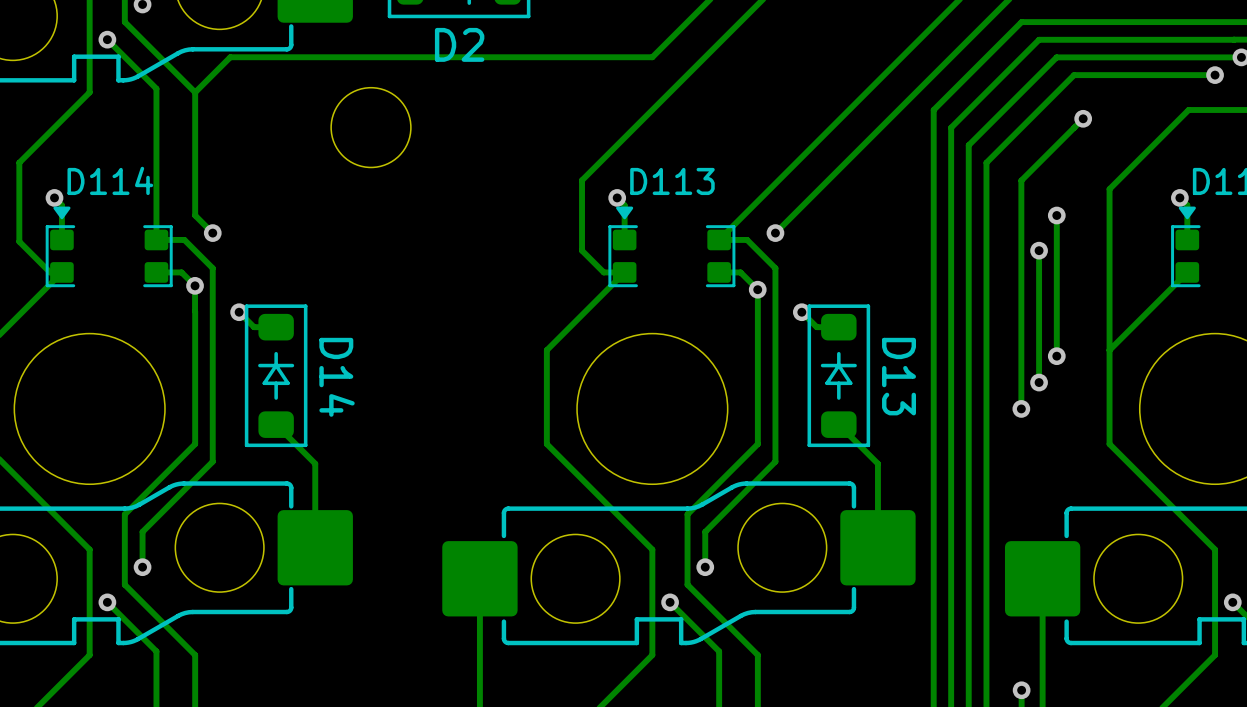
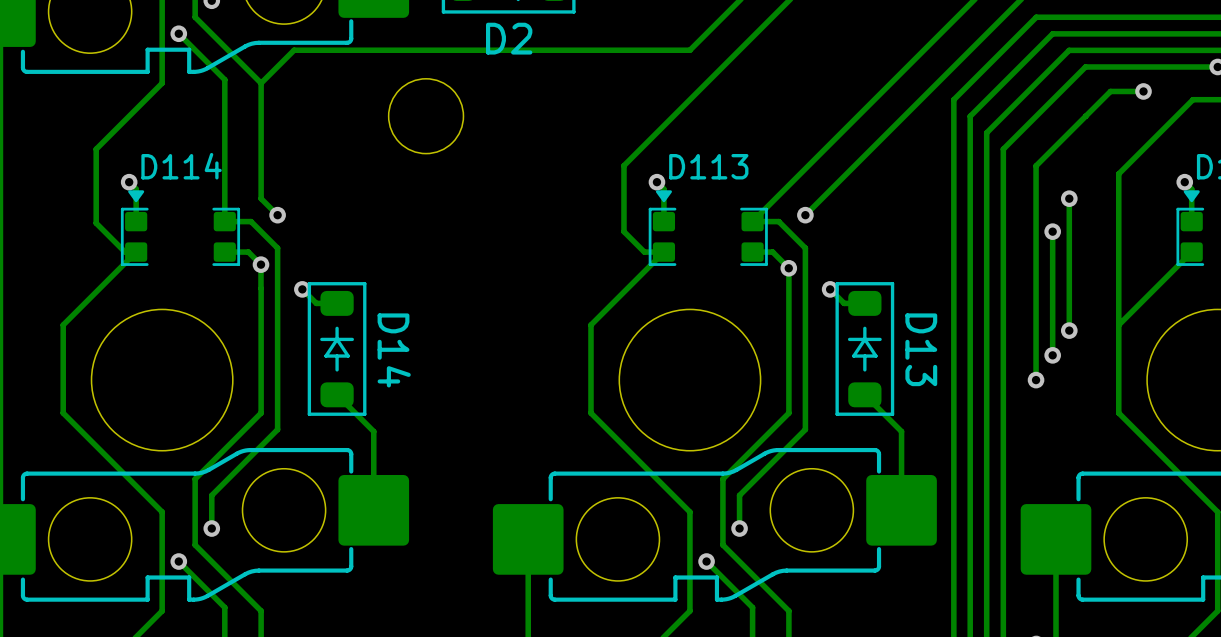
track: none -> (1143, 91) (1110, 91) (1094, 107)
via position: (1083, 118) -> (1143, 91)

